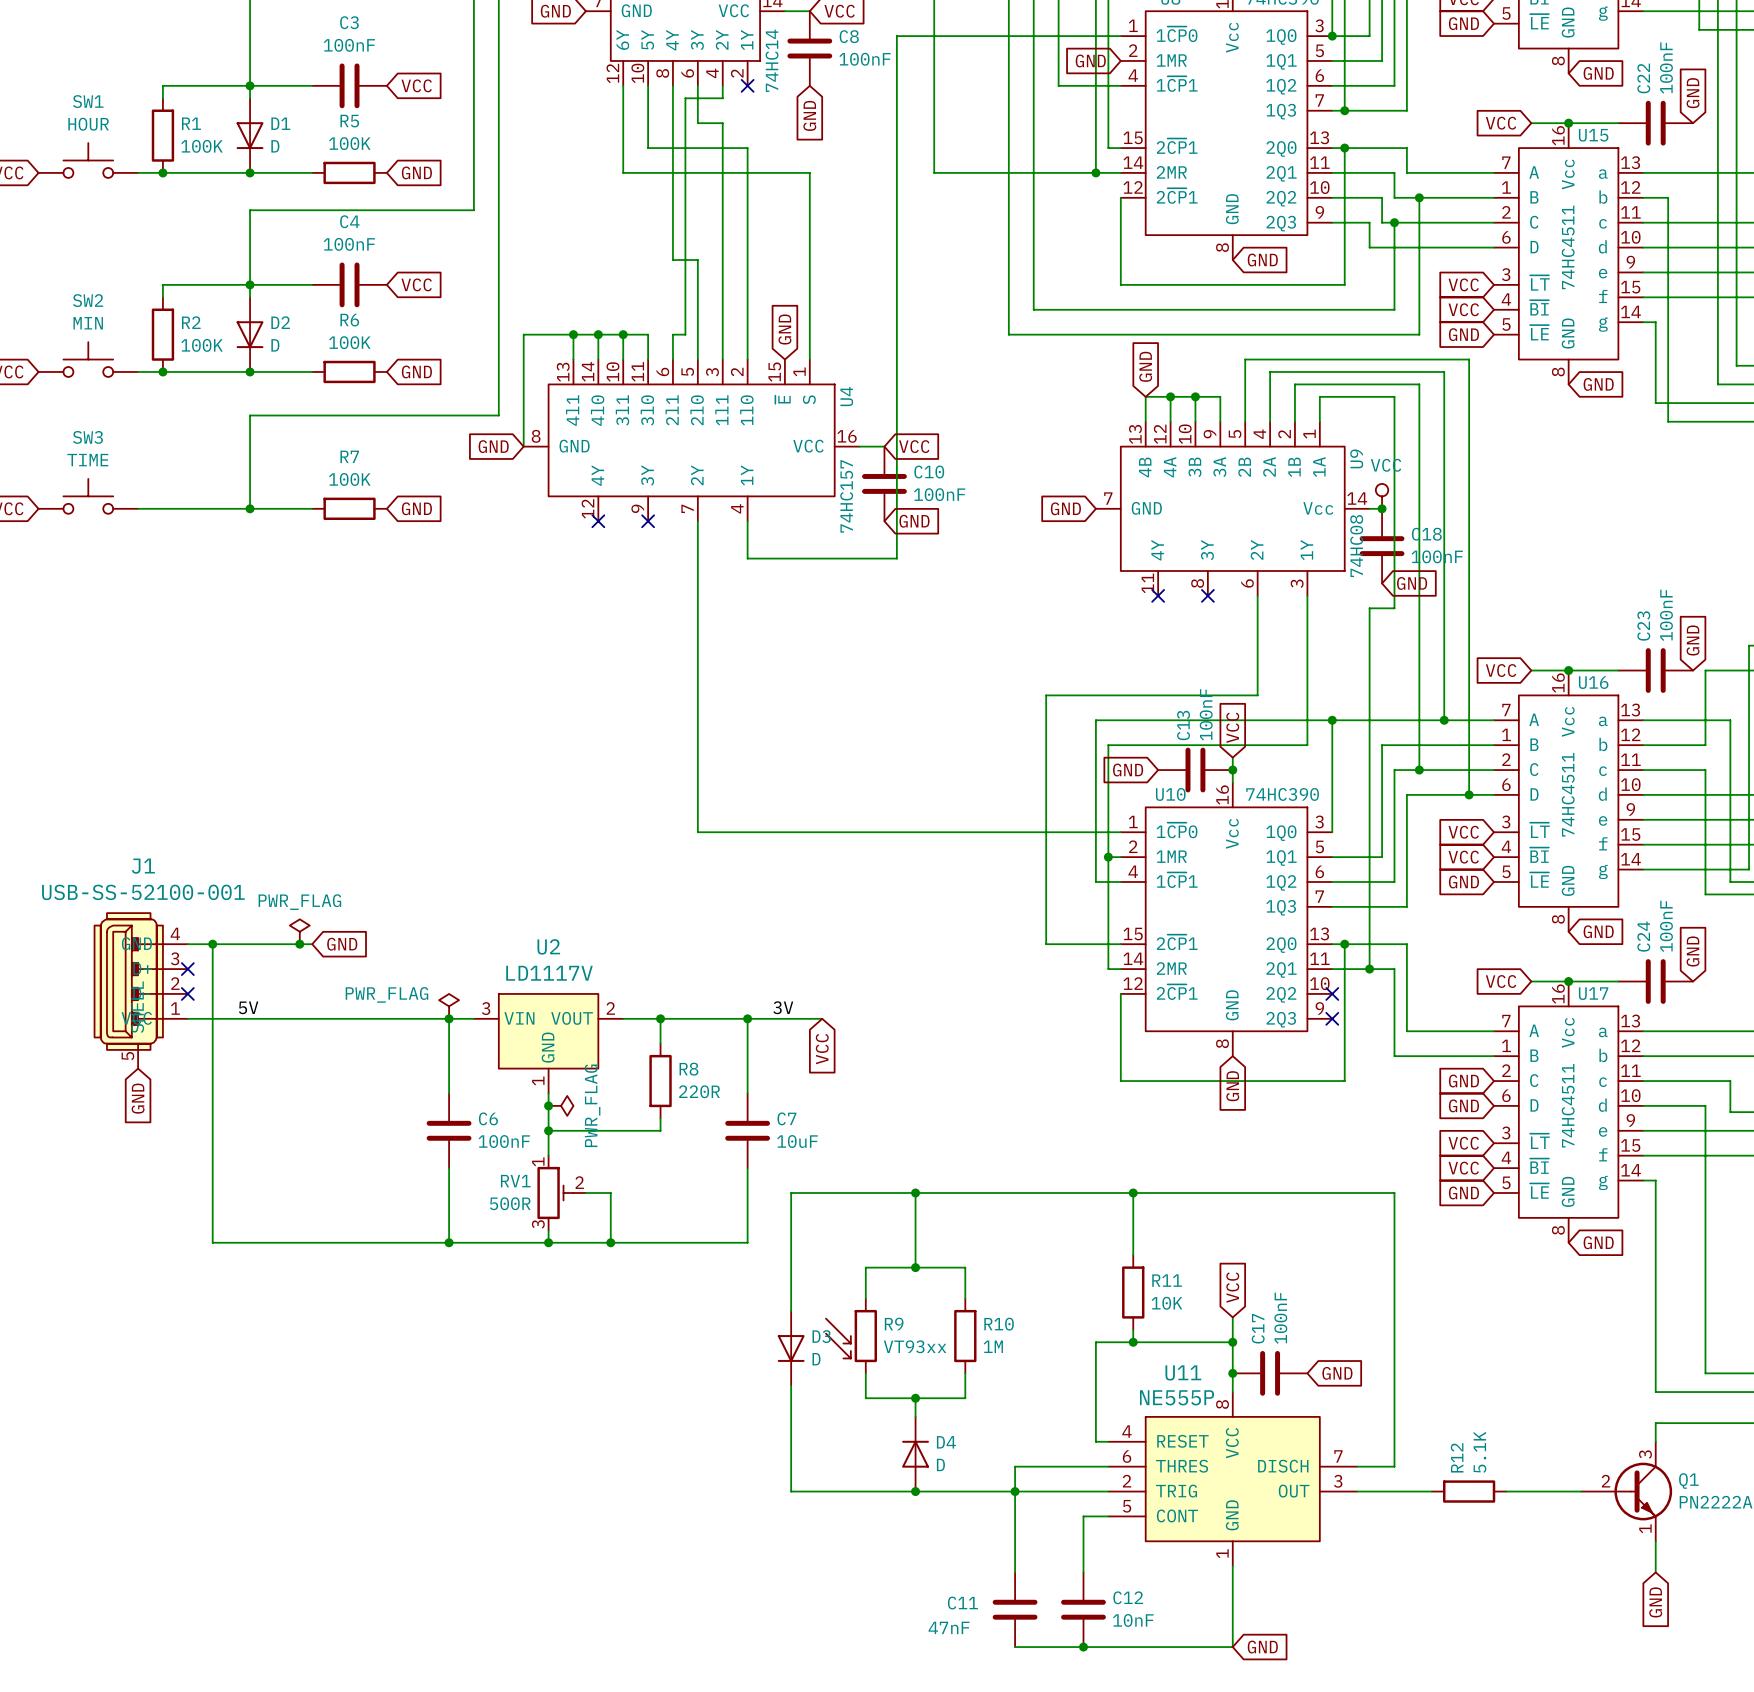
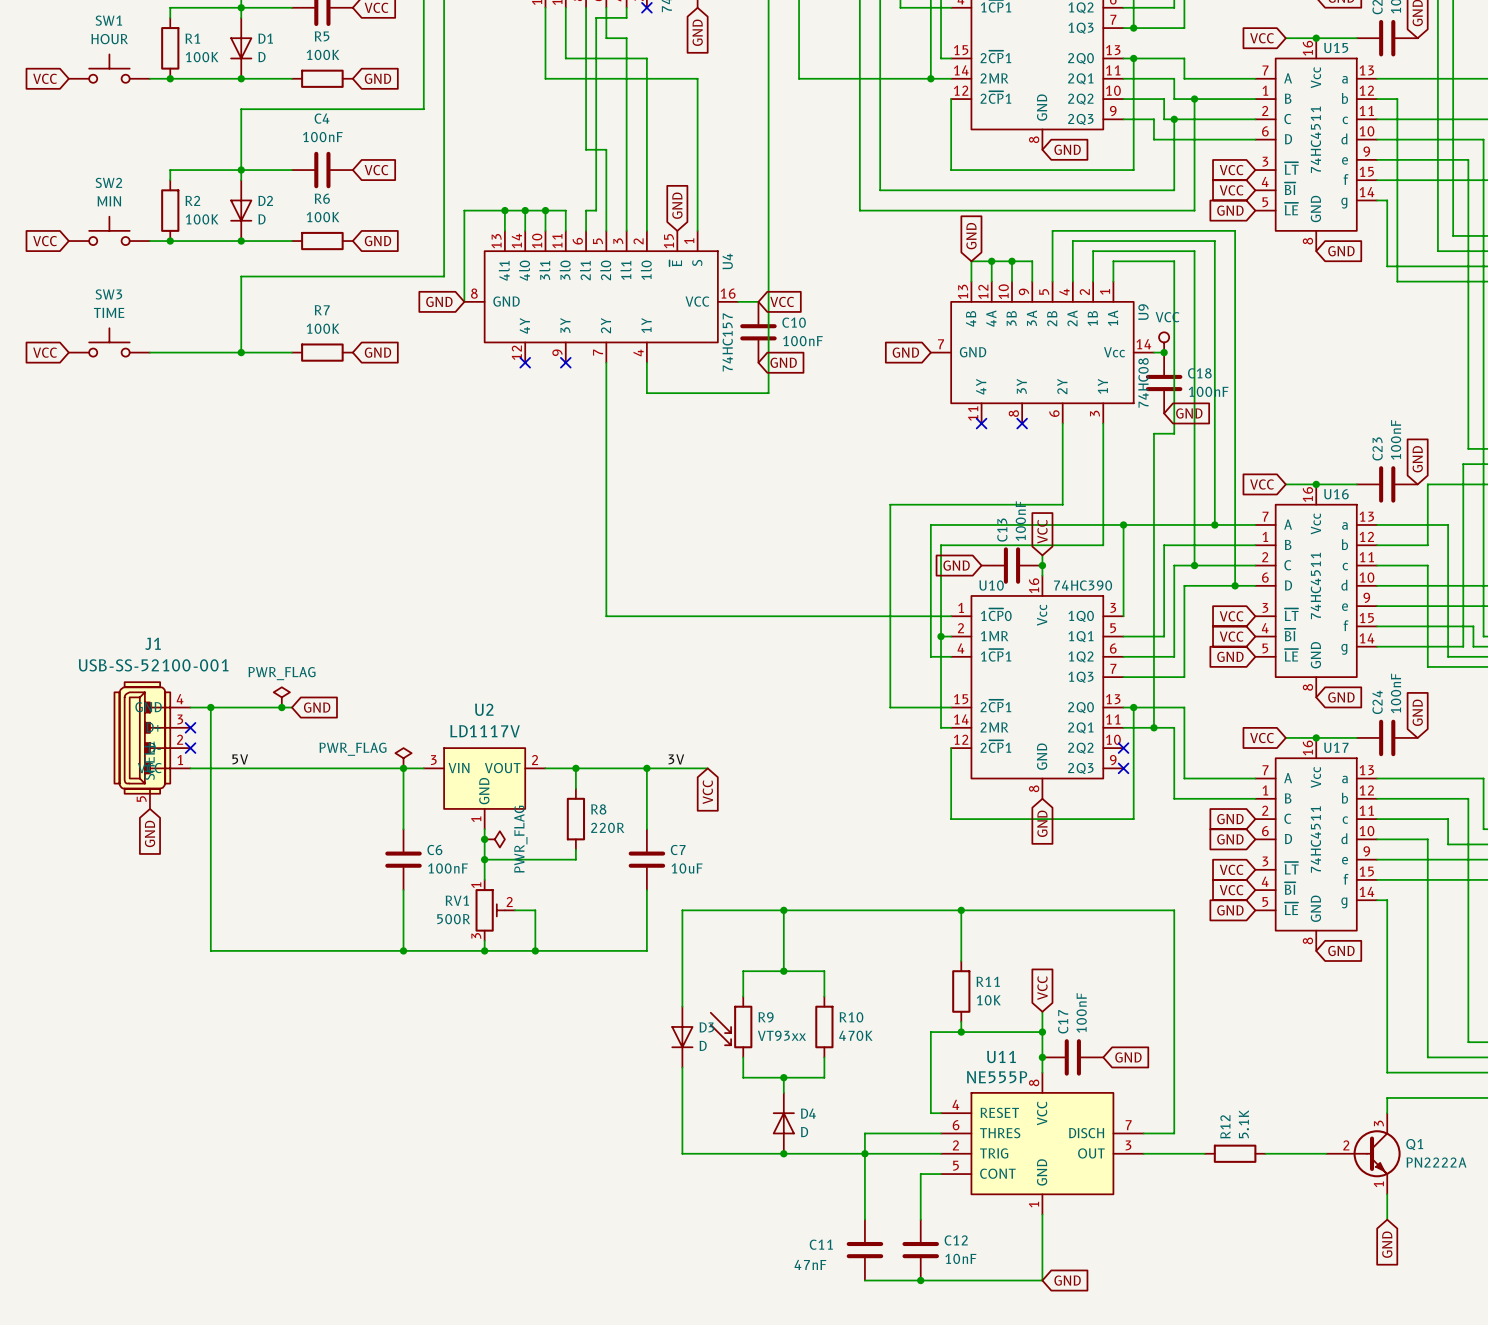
R10 value: 1M (993, 1346) -> 470K (855, 1035)

